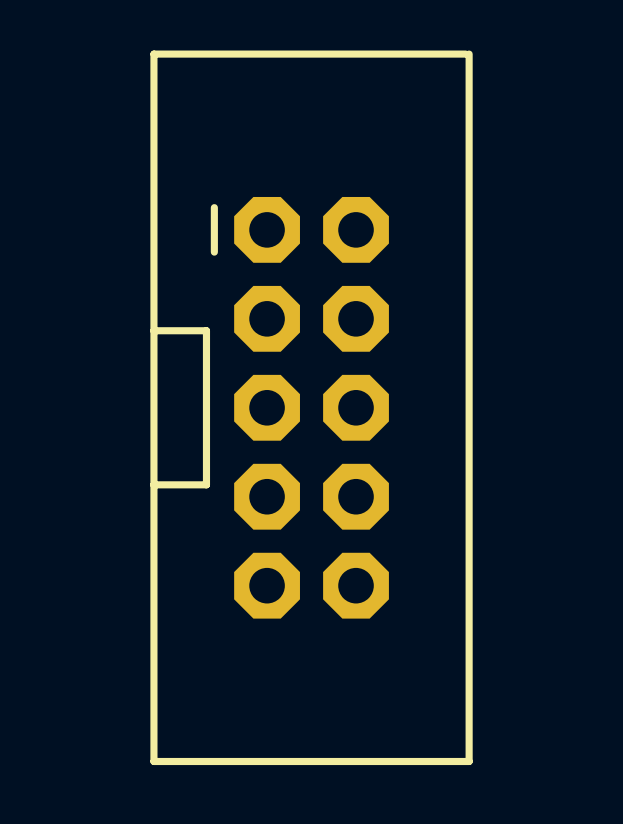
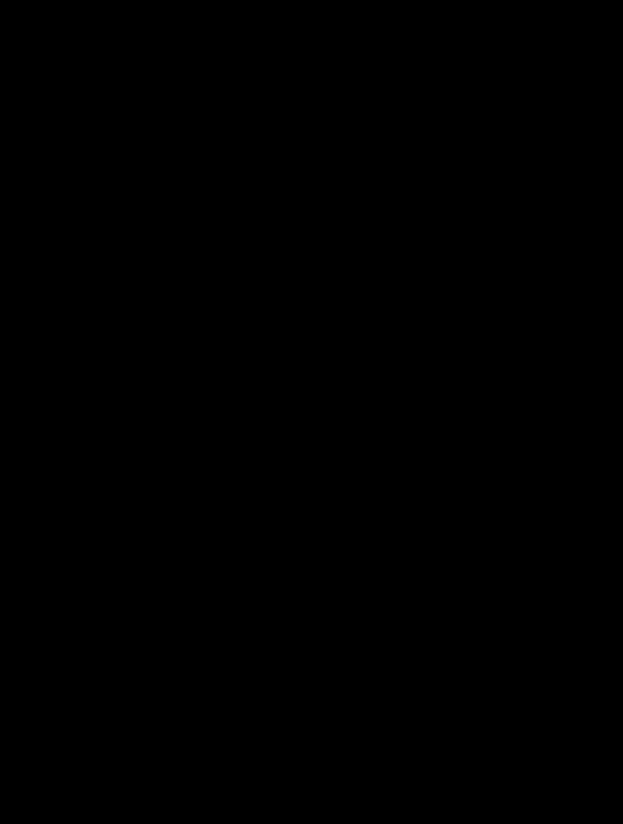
part: (311, 407) -> none

